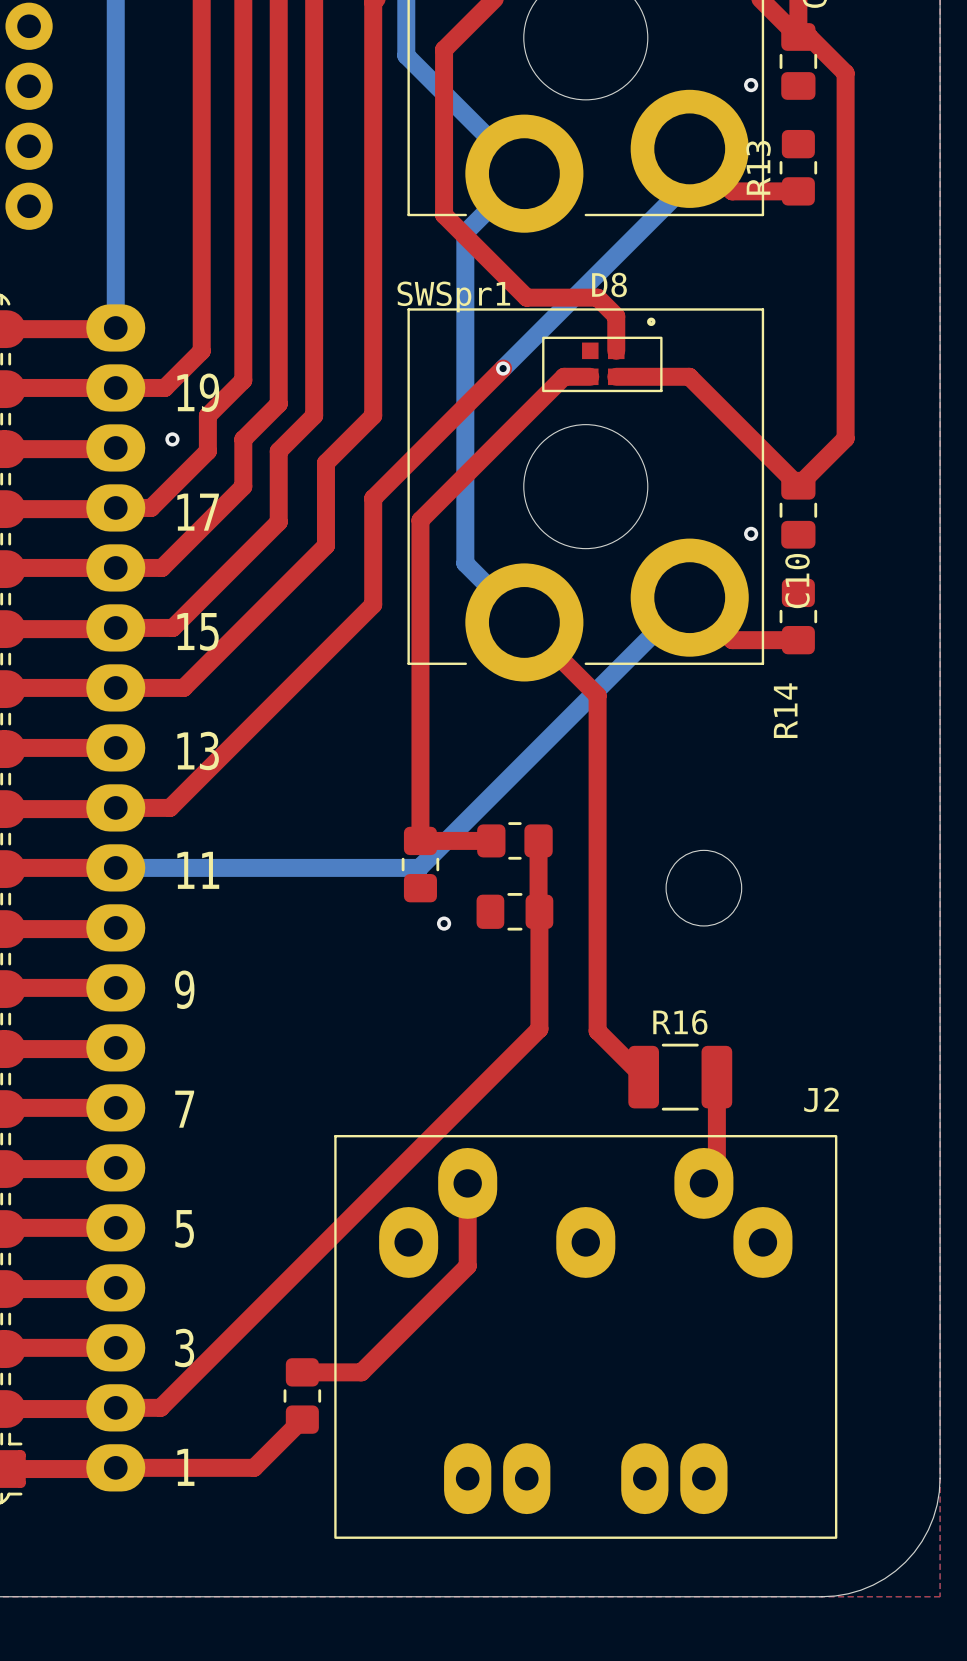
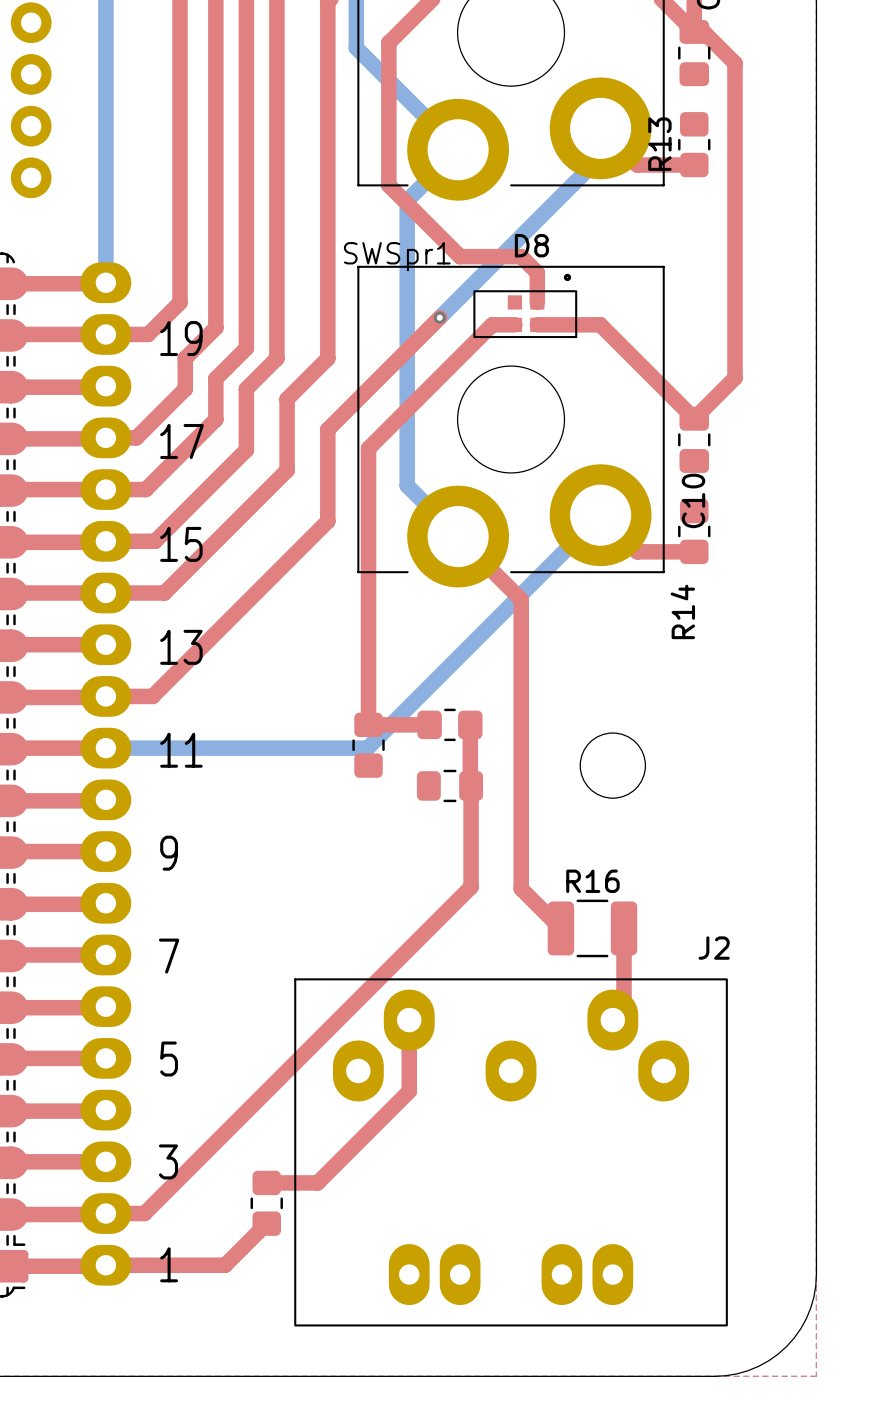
via: (751, 85) -> none
via: (172, 439) -> none
via: (751, 533) -> none
via: (444, 923) -> none

